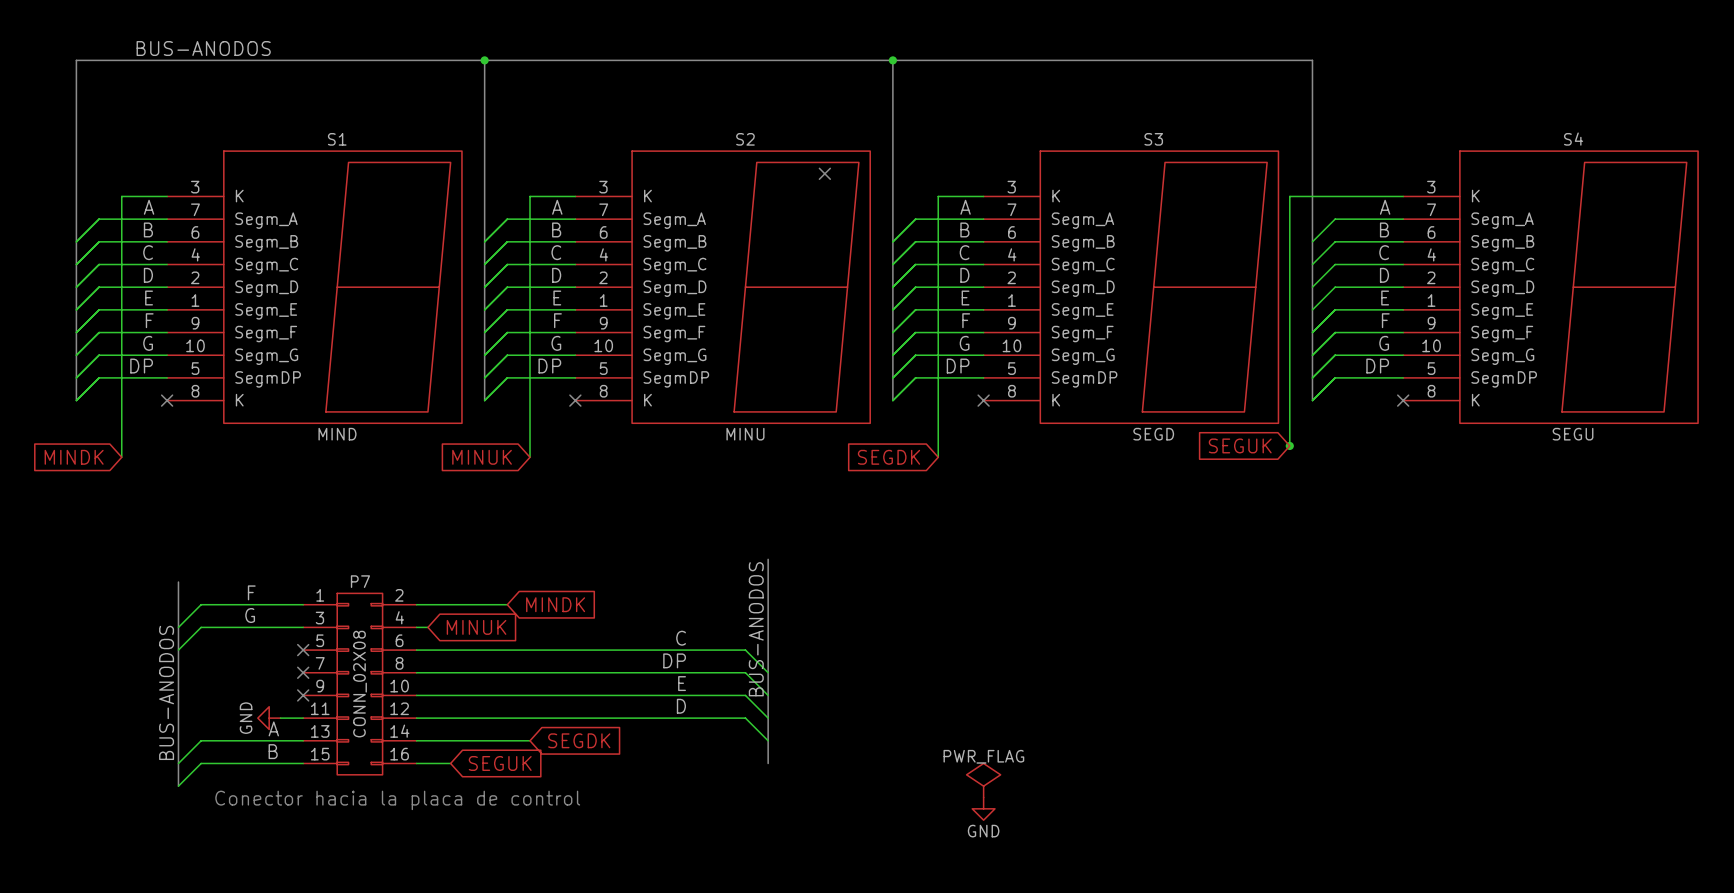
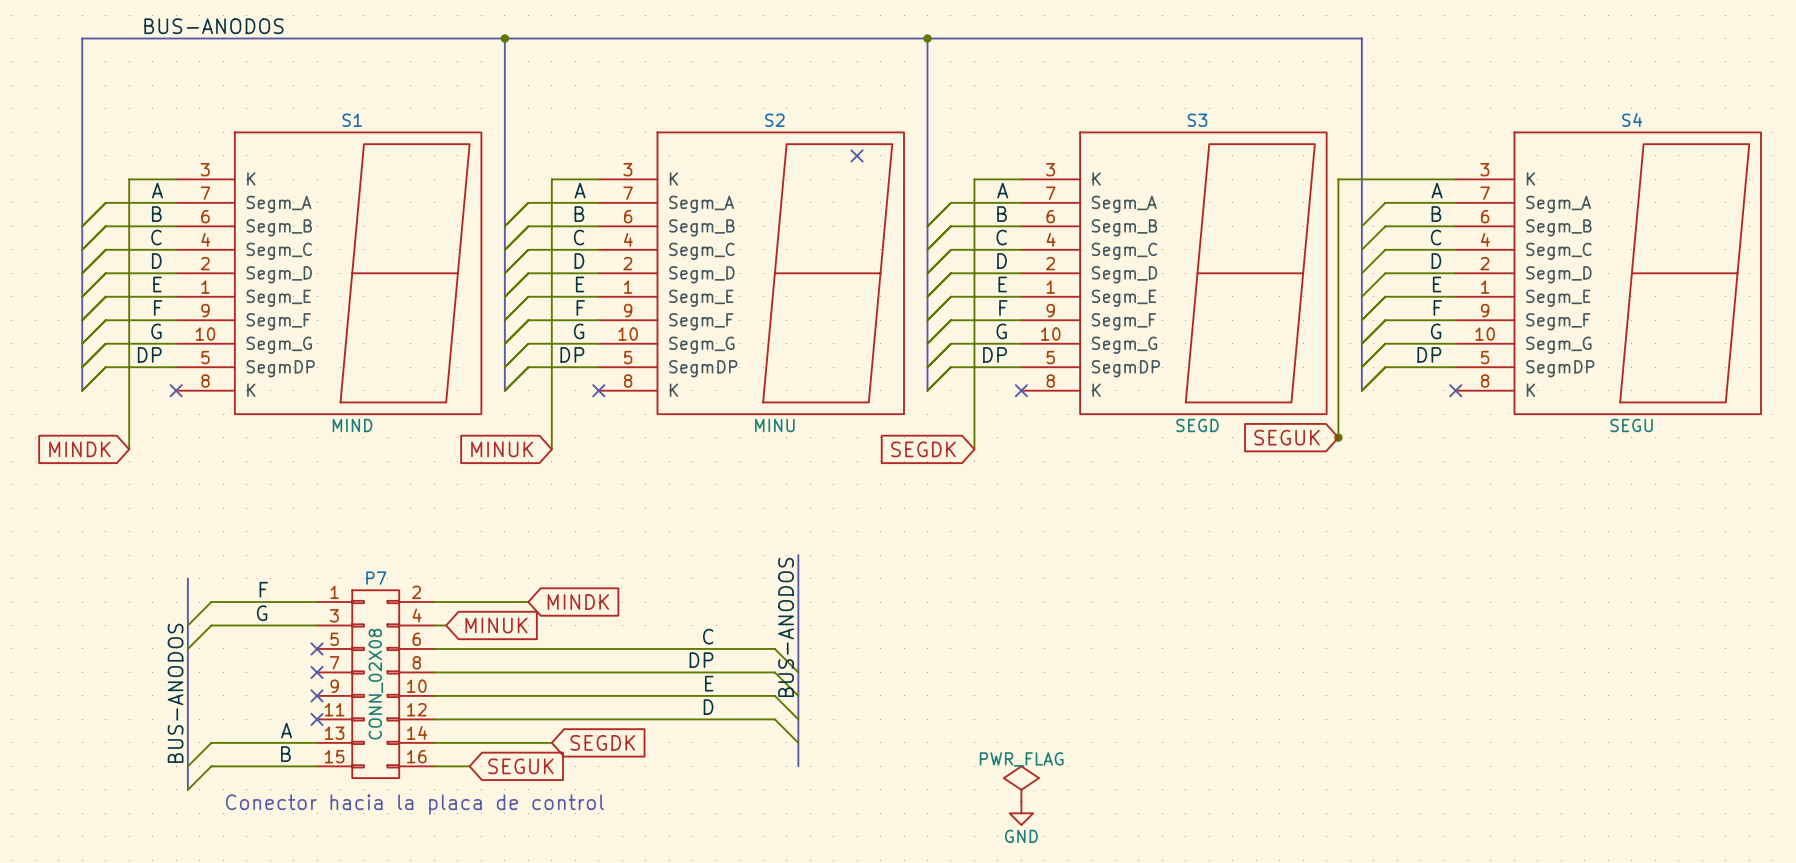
power symbol: GND (269, 718) -> none
wire: (280, 718) (303, 718) -> none
no-connect mark: none -> (317, 719)

